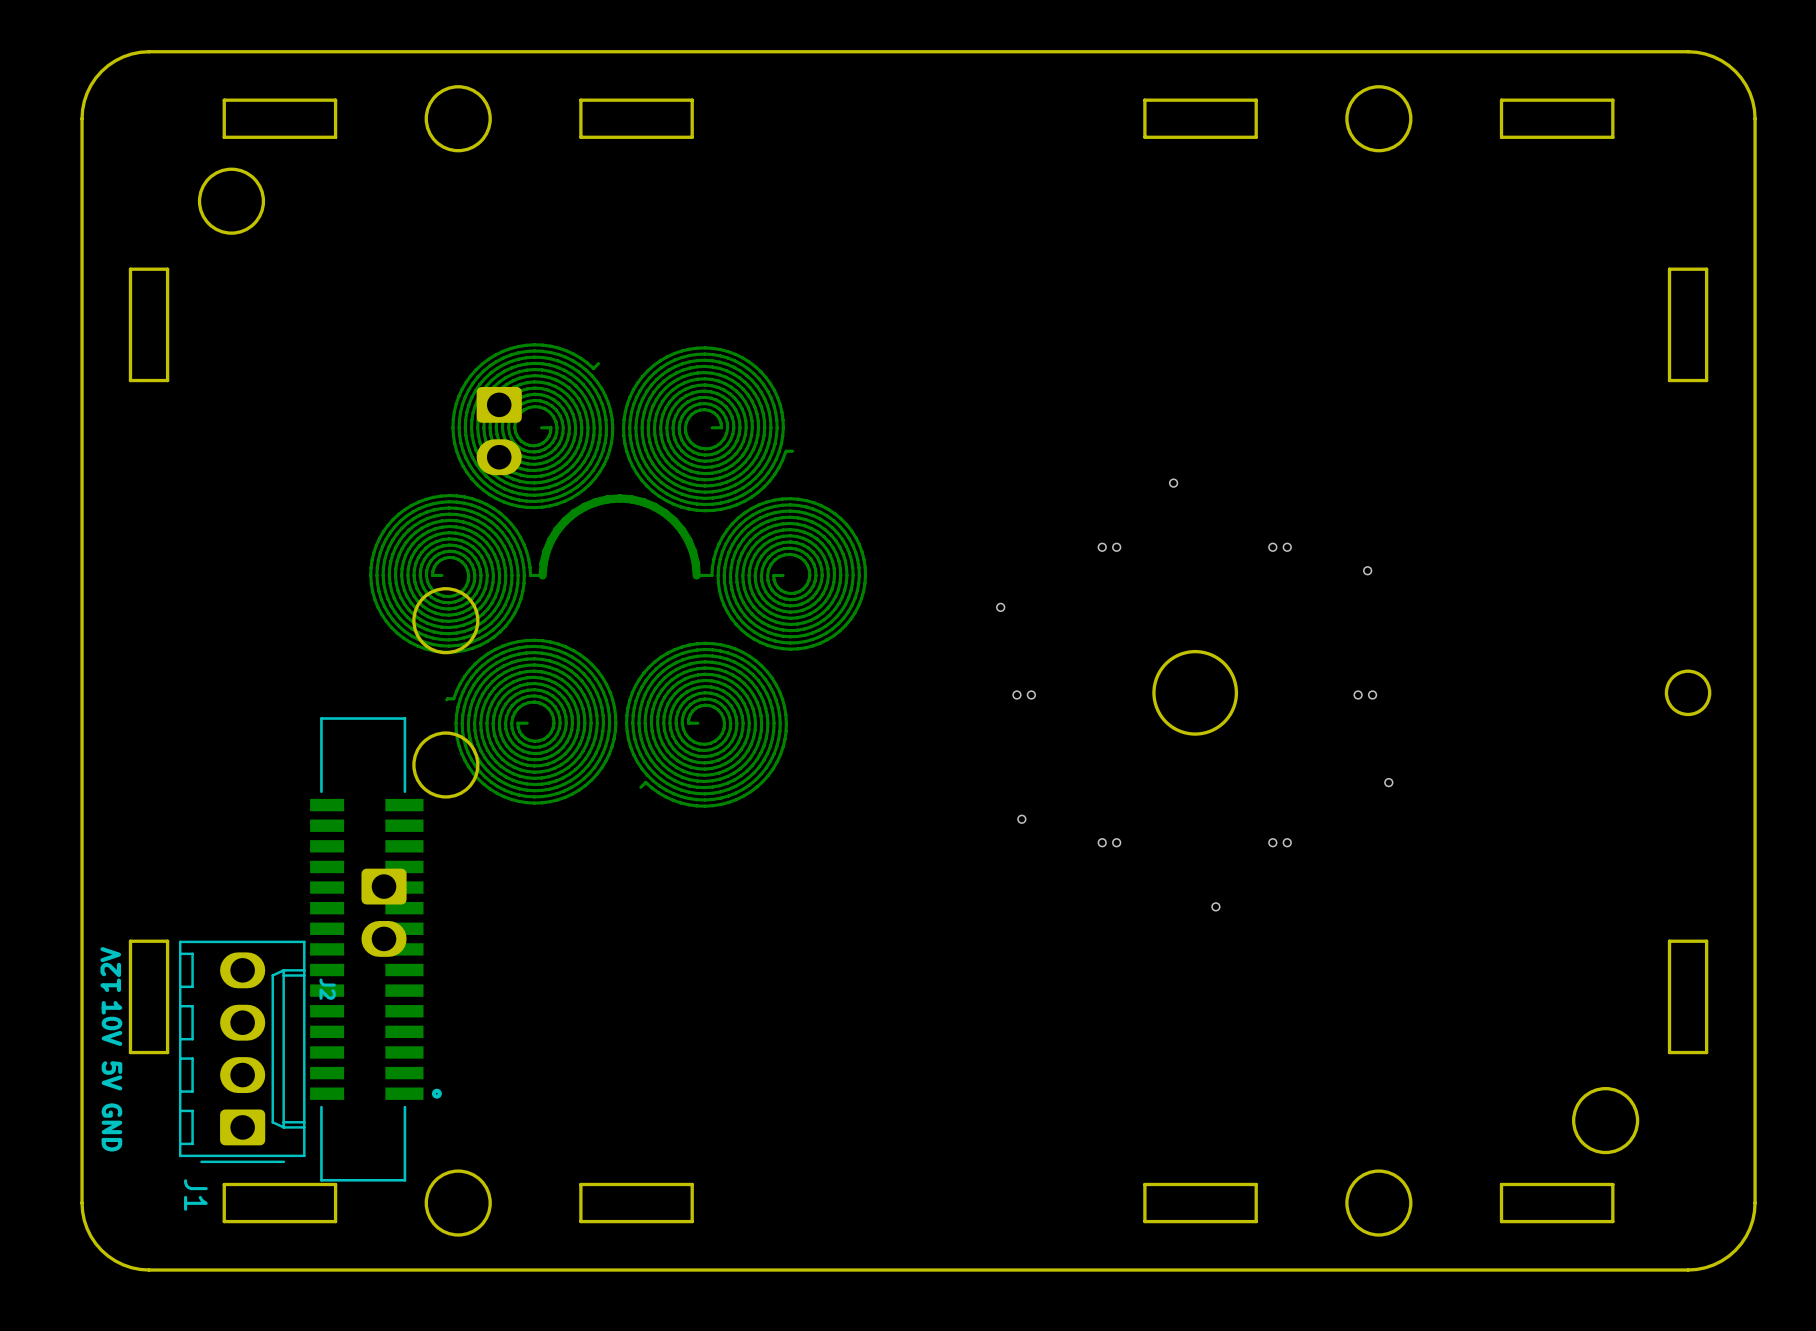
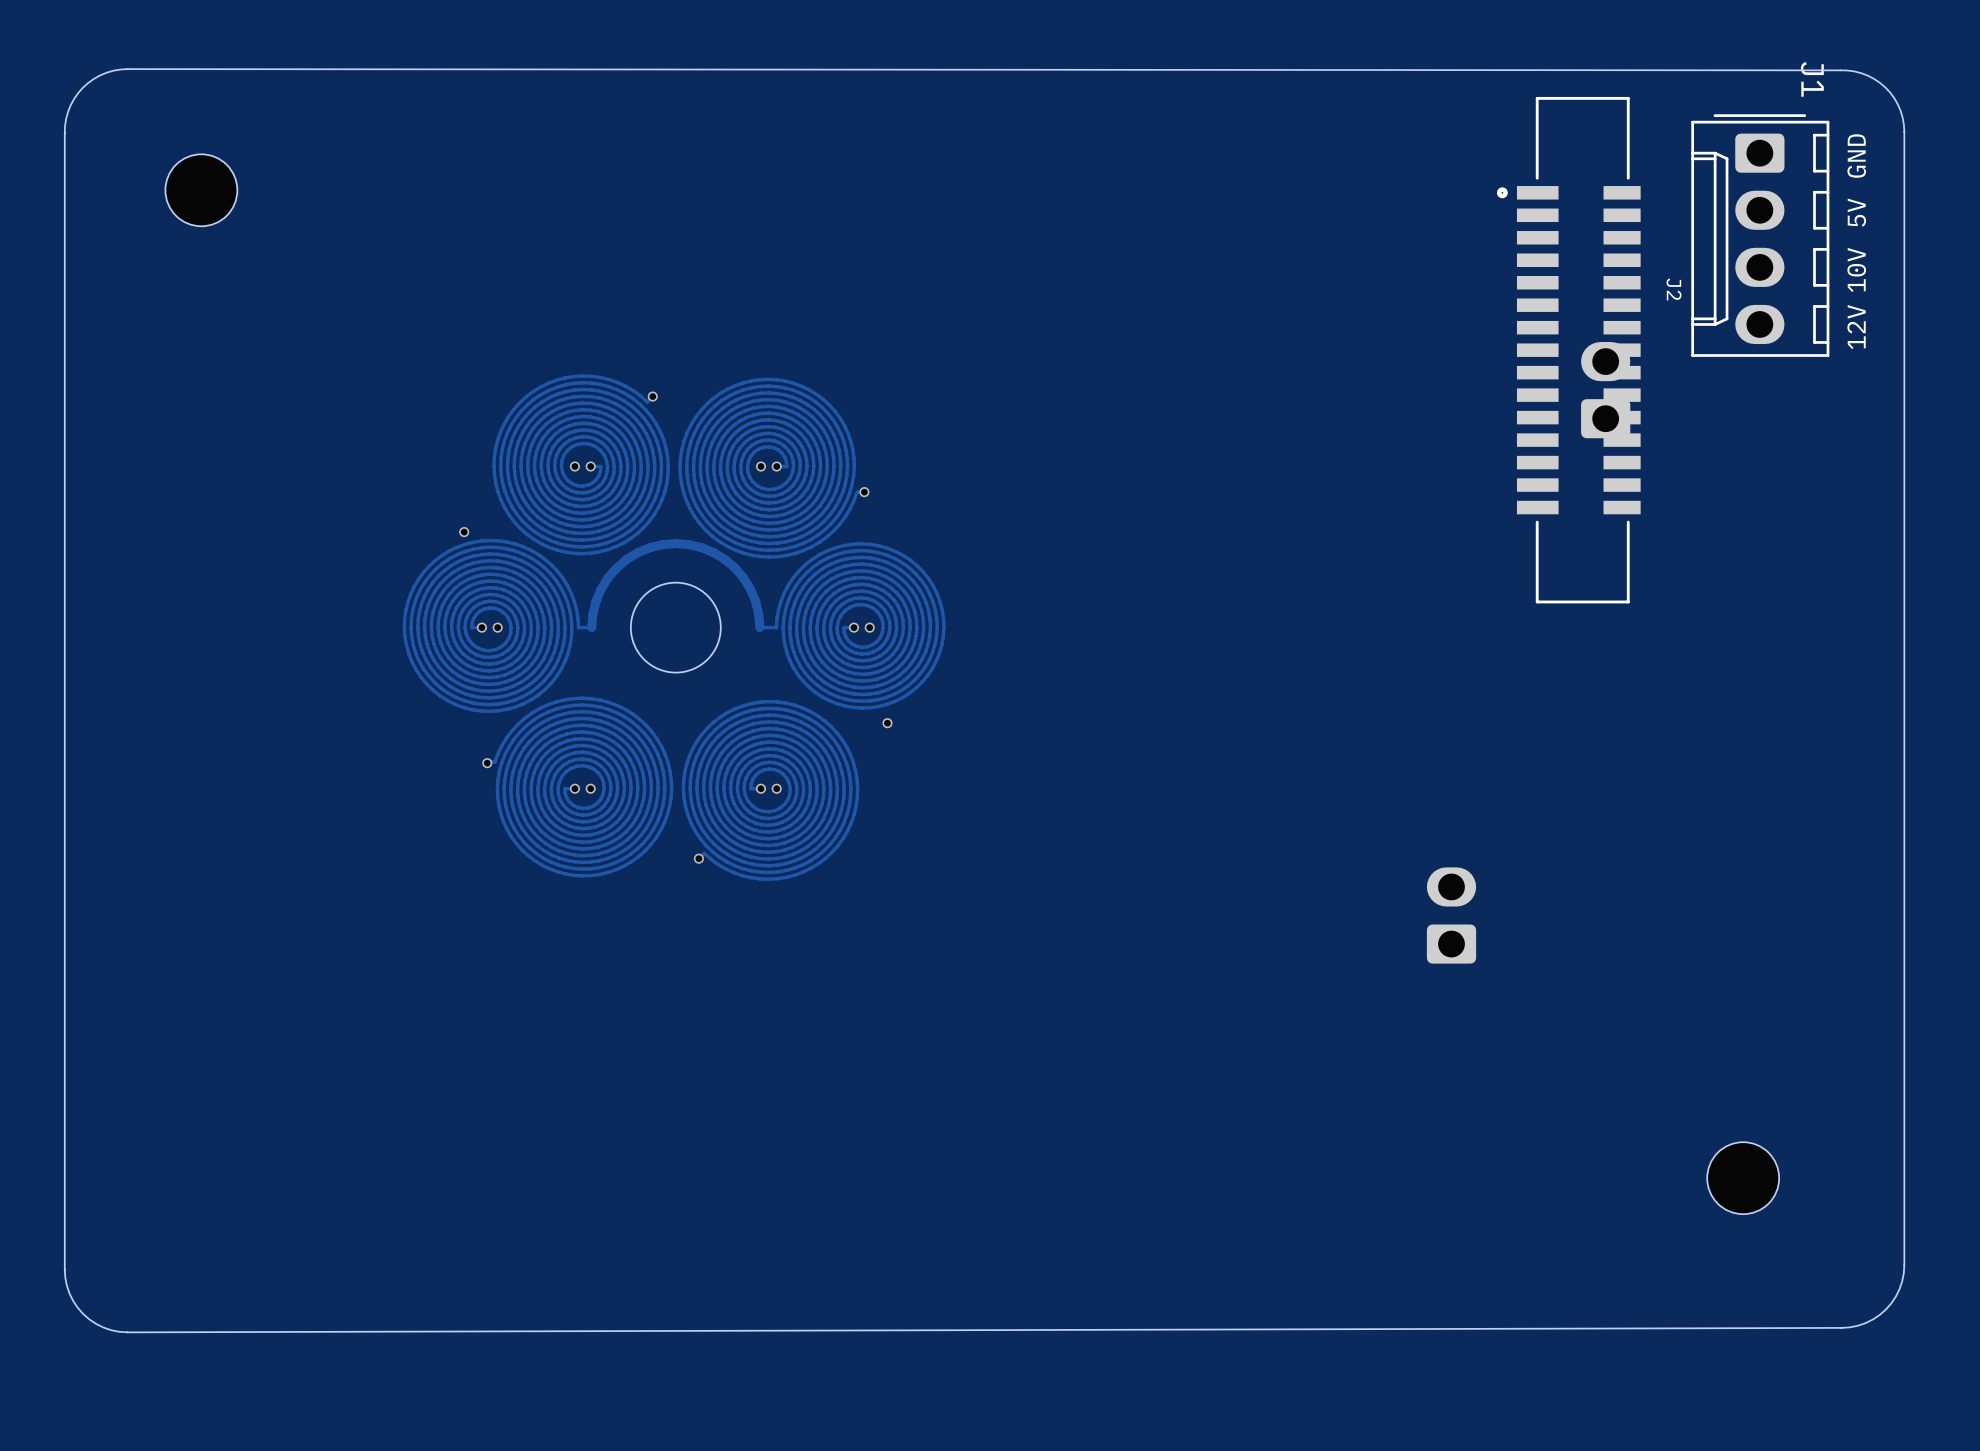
board edge: (1688, 51) (149, 51) (131, 54) (108, 65) (95, 77) (87, 93) (82, 118) (82, 1203) (87, 1228) (95, 1243) (115, 1261) (131, 1267) (149, 1270) (1688, 1270) (1705, 1267) (1728, 1256) (1746, 1236) (1752, 1220) (1755, 1203) (1755, 118) (1749, 93) (1735, 71) (1713, 56) (1688, 51) -> (127, 69) (1840, 70) (1861, 73) (1880, 82) (1890, 92) (1897, 104) (1902, 117) (1904, 131) (1904, 1265) (1902, 1281) (1891, 1303) (1872, 1319) (1857, 1325) (1841, 1327) (127, 1332) (103, 1327) (89, 1319) (77, 1307) (69, 1293) (64, 1269) (64, 133) (67, 112) (73, 99) (82, 87) (100, 75) (113, 70) (127, 69)
round board edge: [424, 85, 492, 153] -> none
round board edge: [1345, 85, 1413, 153] -> none
board edge: (335, 100) (335, 137) (224, 137) (224, 100) (335, 100) -> none
board edge: (692, 100) (580, 100) (580, 137) (692, 137) (692, 100) -> none
board edge: (1256, 100) (1256, 137) (1144, 137) (1144, 100) (1256, 100) -> none
board edge: (1612, 100) (1612, 137) (1501, 137) (1501, 100) (1612, 100) -> none
text: none -> GND (1856, 156)
round board edge: [197, 167, 266, 235] -> none
part: none -> (201, 190)
text: none -> 5V (1856, 212)
text: none -> 10V (1856, 270)
board edge: (167, 269) (130, 269) (130, 380) (167, 380) (167, 269) -> none
board edge: (1706, 269) (1706, 380) (1669, 380) (1669, 269) (1706, 269) -> none
text: none -> 12V (1856, 327)
part: none -> (1605, 390)
via: none -> (652, 396)
via: none -> (574, 466)
via: none -> (590, 466)
via: none -> (760, 466)
via: none -> (776, 466)
part: (499, 431) -> none
via: none -> (864, 492)
via: (1173, 483) -> none
via: none -> (464, 532)
round board edge: none -> [630, 582, 722, 674]
via: (1102, 547) -> none
via: (1116, 547) -> none
via: (1272, 547) -> none
via: (1287, 547) -> none
via: (1367, 570) -> none
via: none -> (481, 627)
via: none -> (497, 627)
via: none -> (853, 627)
via: none -> (869, 627)
round board edge: [412, 587, 480, 655] -> none
via: (1000, 607) -> none
round board edge: [1152, 649, 1239, 736] -> none
via: none -> (887, 723)
round board edge: [1664, 669, 1712, 717] -> none
via: (1016, 694) -> none
via: (1031, 694) -> none
via: (1358, 694) -> none
via: (1372, 694) -> none
via: none -> (487, 763)
via: none -> (574, 788)
via: none -> (590, 788)
via: none -> (760, 788)
via: none -> (776, 788)
round board edge: [412, 731, 480, 799] -> none
via: (1388, 782) -> none
via: none -> (698, 858)
via: (1021, 819) -> none
part: none -> (1451, 915)
via: (1102, 842) -> none
via: (1116, 842) -> none
via: (1272, 842) -> none
via: (1287, 842) -> none
via: (1215, 906) -> none
part: (384, 912) -> none
board edge: (167, 941) (130, 941) (130, 1052) (167, 1052) (167, 941) -> none
board edge: (1706, 941) (1706, 1052) (1669, 1052) (1669, 941) (1706, 941) -> none
J2 rotation: 0° (375, 949) -> 180° (1568, 350)
J2 position: (375, 949) -> (1568, 350)
text: 12V (110, 969) -> none
J2 name position: J2 (327, 989) -> J2 (1673, 289)
text: 10V (111, 1023) -> none
J1 rotation: 0° (242, 1051) -> 180° (1760, 235)
J1 position: (242, 1051) -> (1760, 235)
text: 5V (111, 1075) -> none
part: none -> (1743, 1178)
round board edge: [1572, 1086, 1640, 1155] -> none
text: GND (111, 1127) -> none
round board edge: [424, 1169, 492, 1237] -> none
round board edge: [1345, 1169, 1413, 1237] -> none
board edge: (335, 1184) (224, 1184) (224, 1221) (335, 1221) (335, 1184) -> none
board edge: (692, 1184) (580, 1184) (580, 1221) (692, 1221) (692, 1184) -> none
board edge: (1256, 1184) (1256, 1221) (1144, 1221) (1144, 1184) (1256, 1184) -> none
board edge: (1612, 1184) (1501, 1184) (1501, 1221) (1612, 1221) (1612, 1184) -> none

